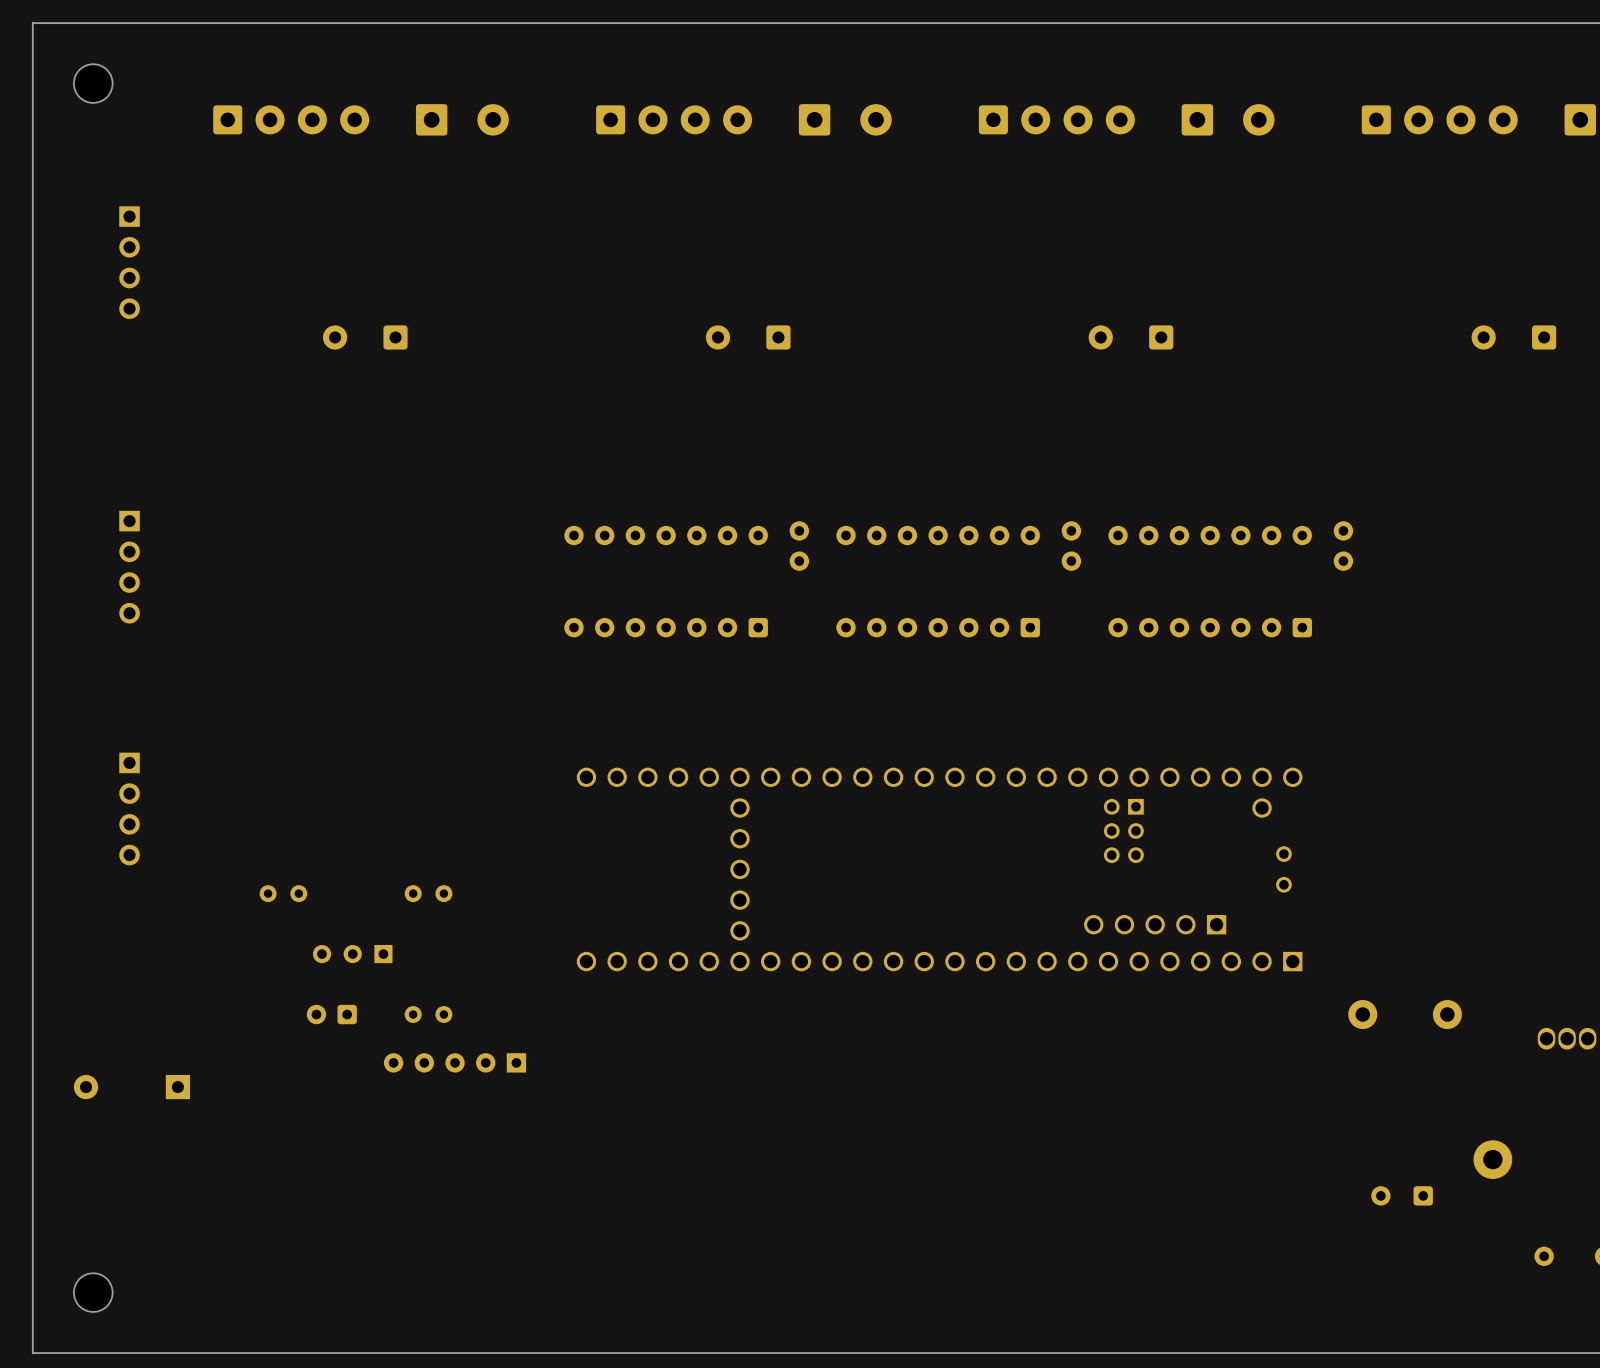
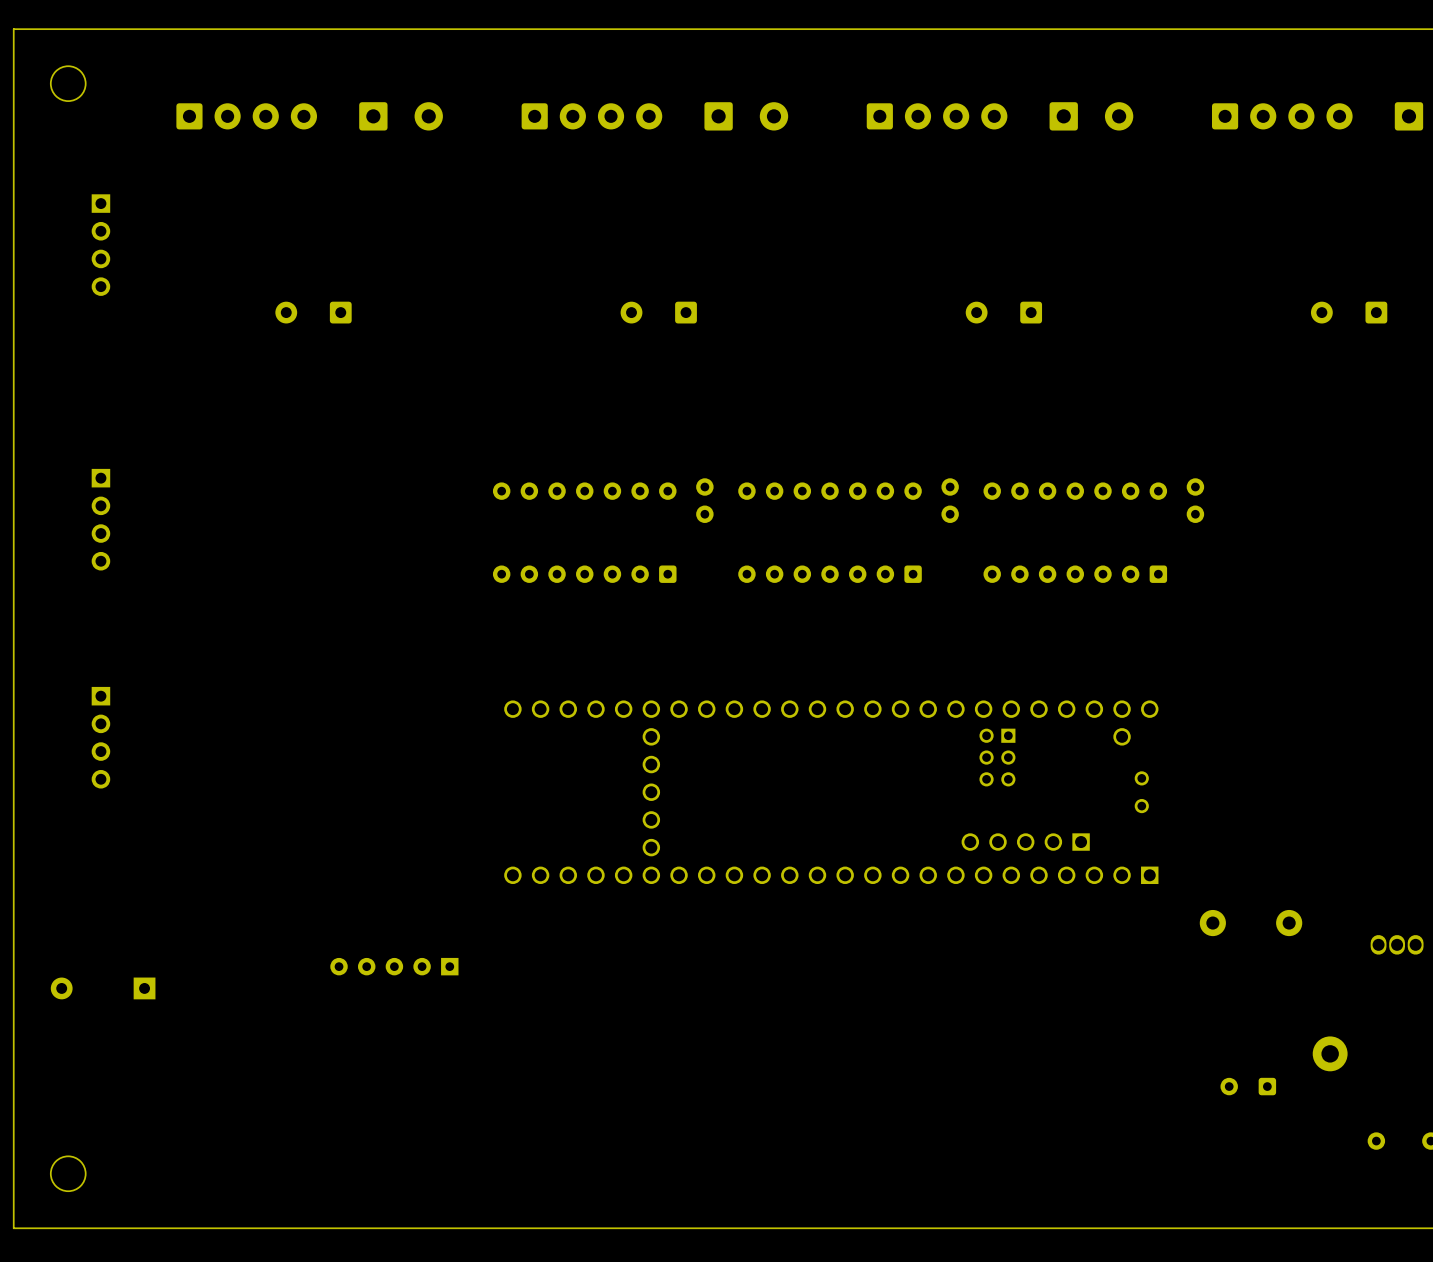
part: (283, 893) -> none
part: (428, 893) -> none
part: (352, 954) -> none
part: (331, 1014) -> none
part: (428, 1014) -> none

